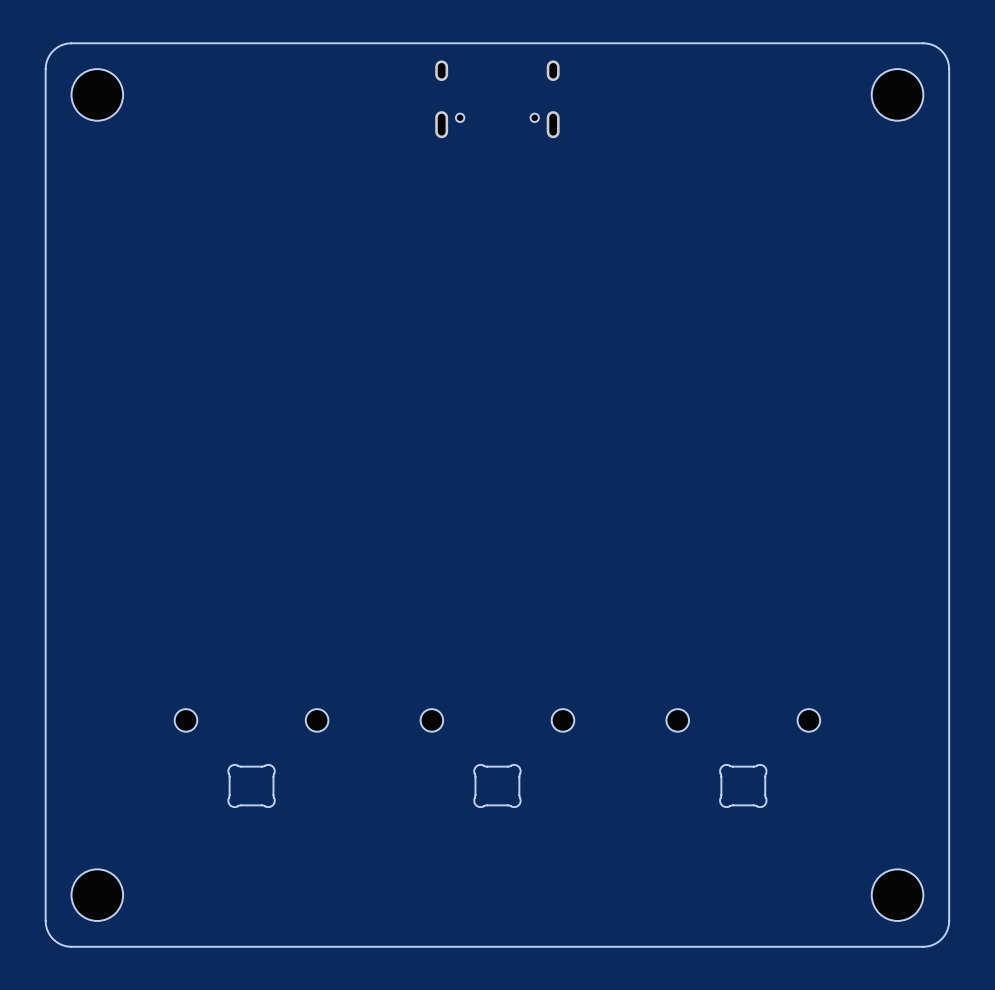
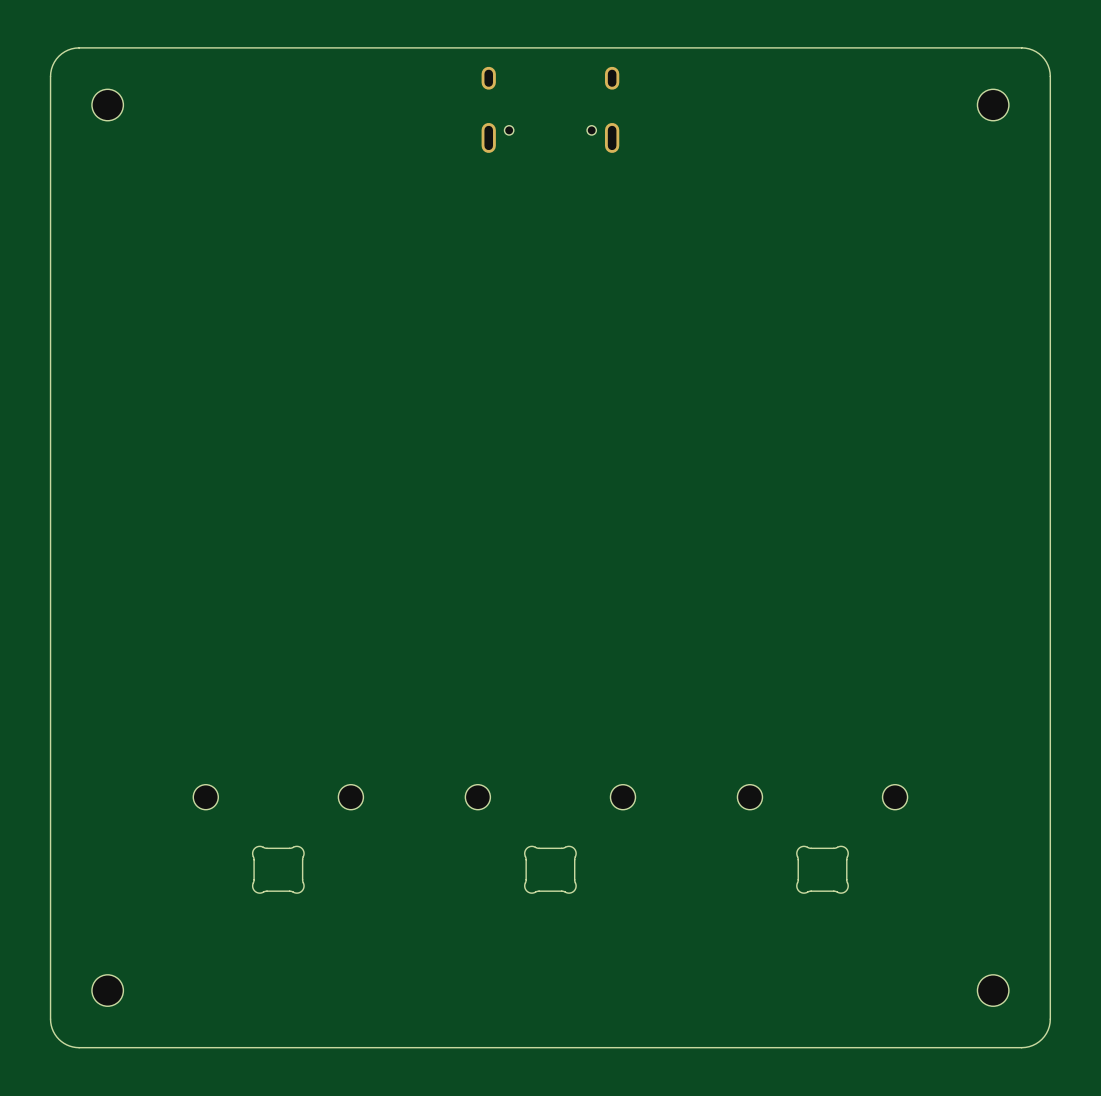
part footprint: [71, 69, 124, 121] -> [91, 89, 124, 121]
part footprint: [871, 69, 924, 121] -> [977, 89, 1009, 121]
part footprint: [71, 869, 124, 921] -> [91, 974, 124, 1007]
part footprint: [871, 869, 924, 921] -> [977, 974, 1009, 1007]

